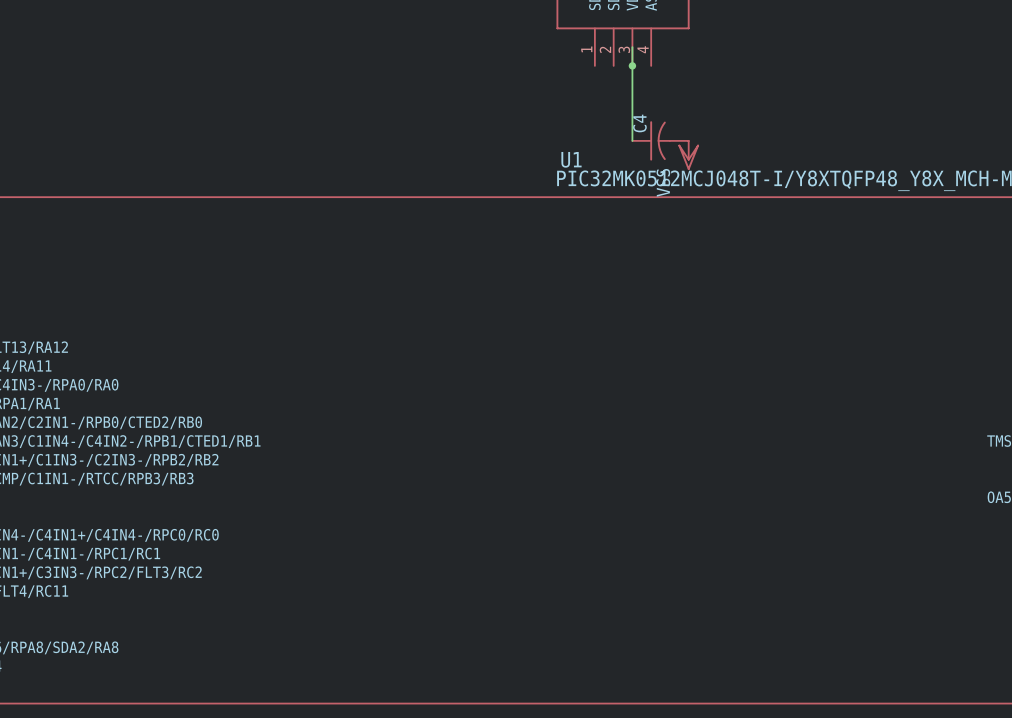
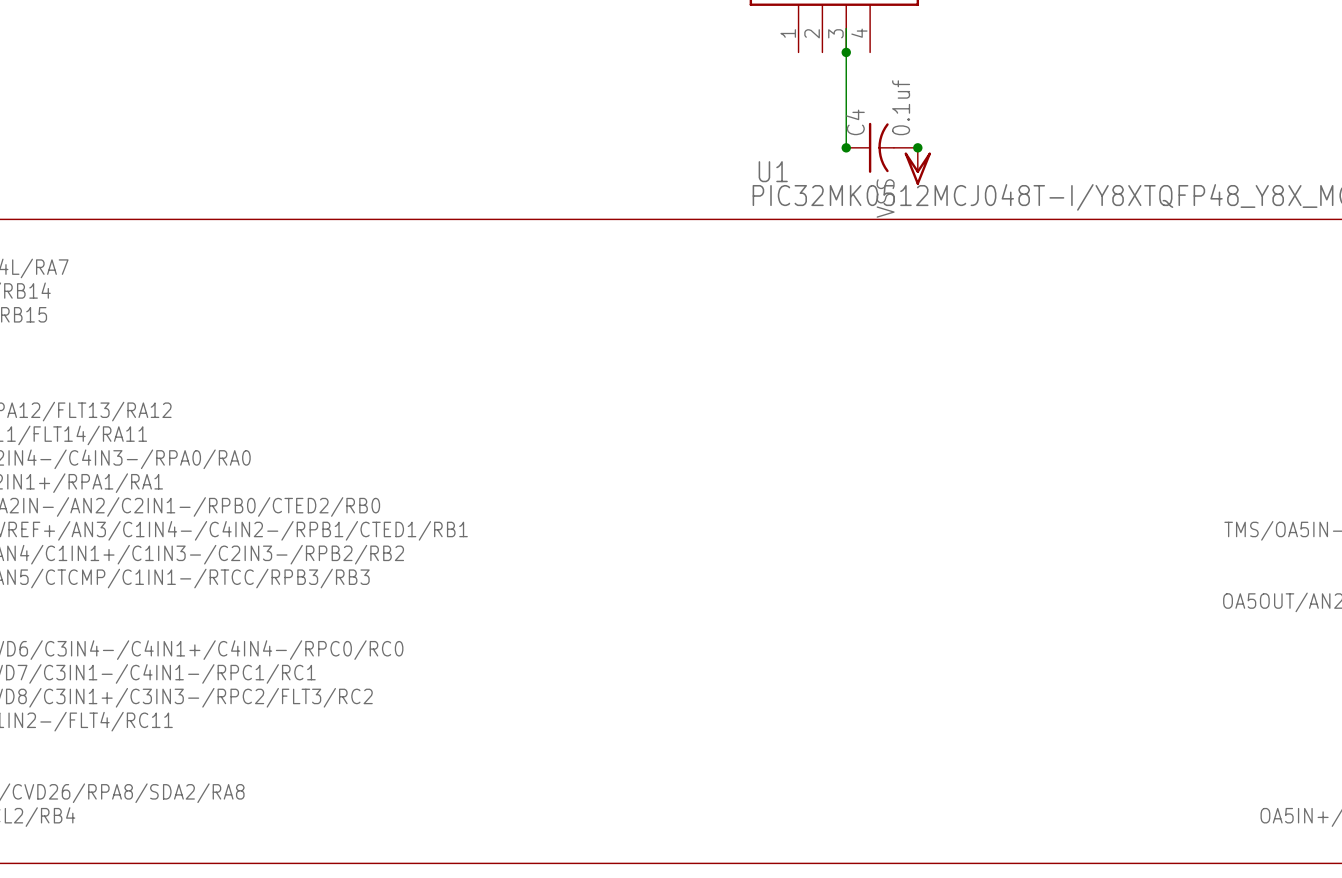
C4 value: none -> 0.1uf (901, 107)
junction: none -> (846, 147)
junction: none -> (917, 147)

